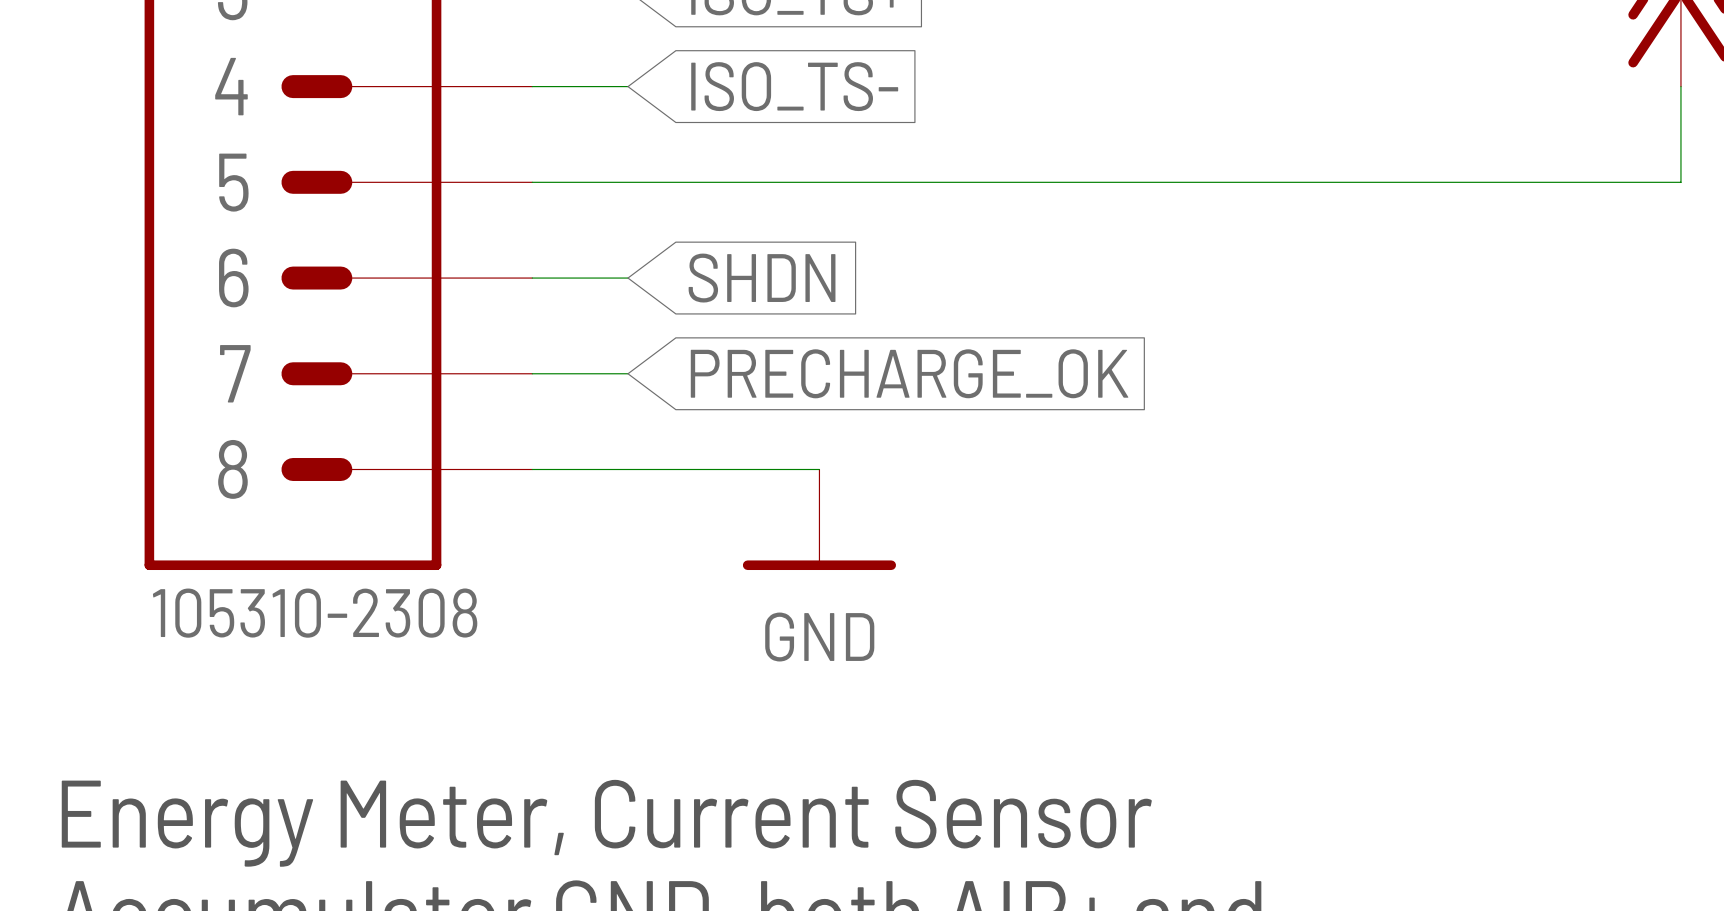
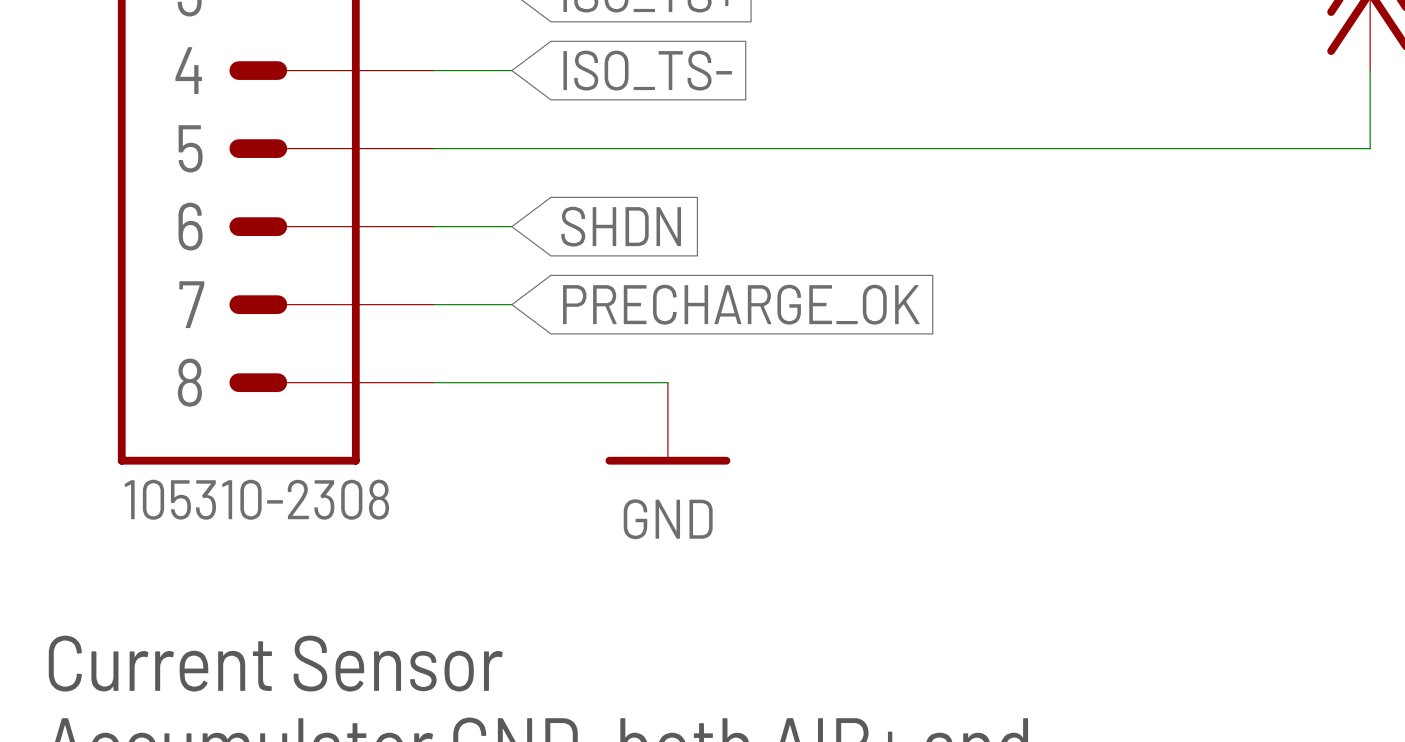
text: Energy Meter, Current Sensor (606, 823) -> Current Sensor (275, 663)

